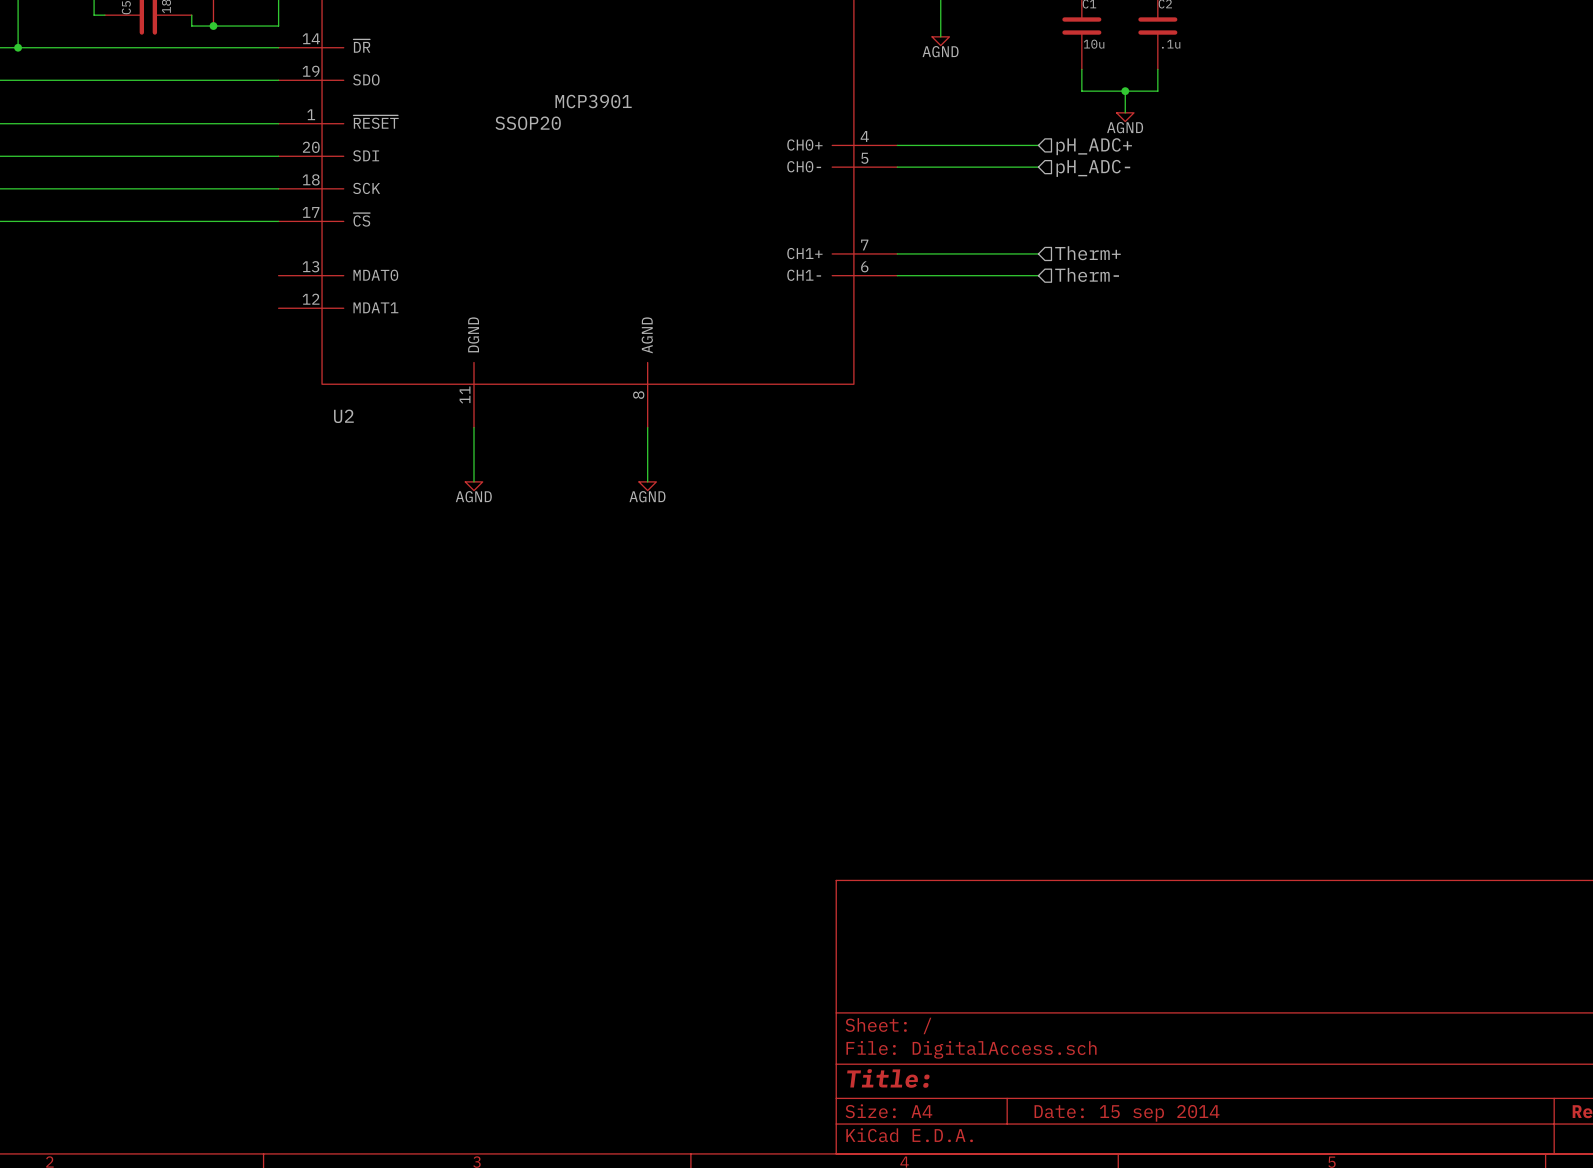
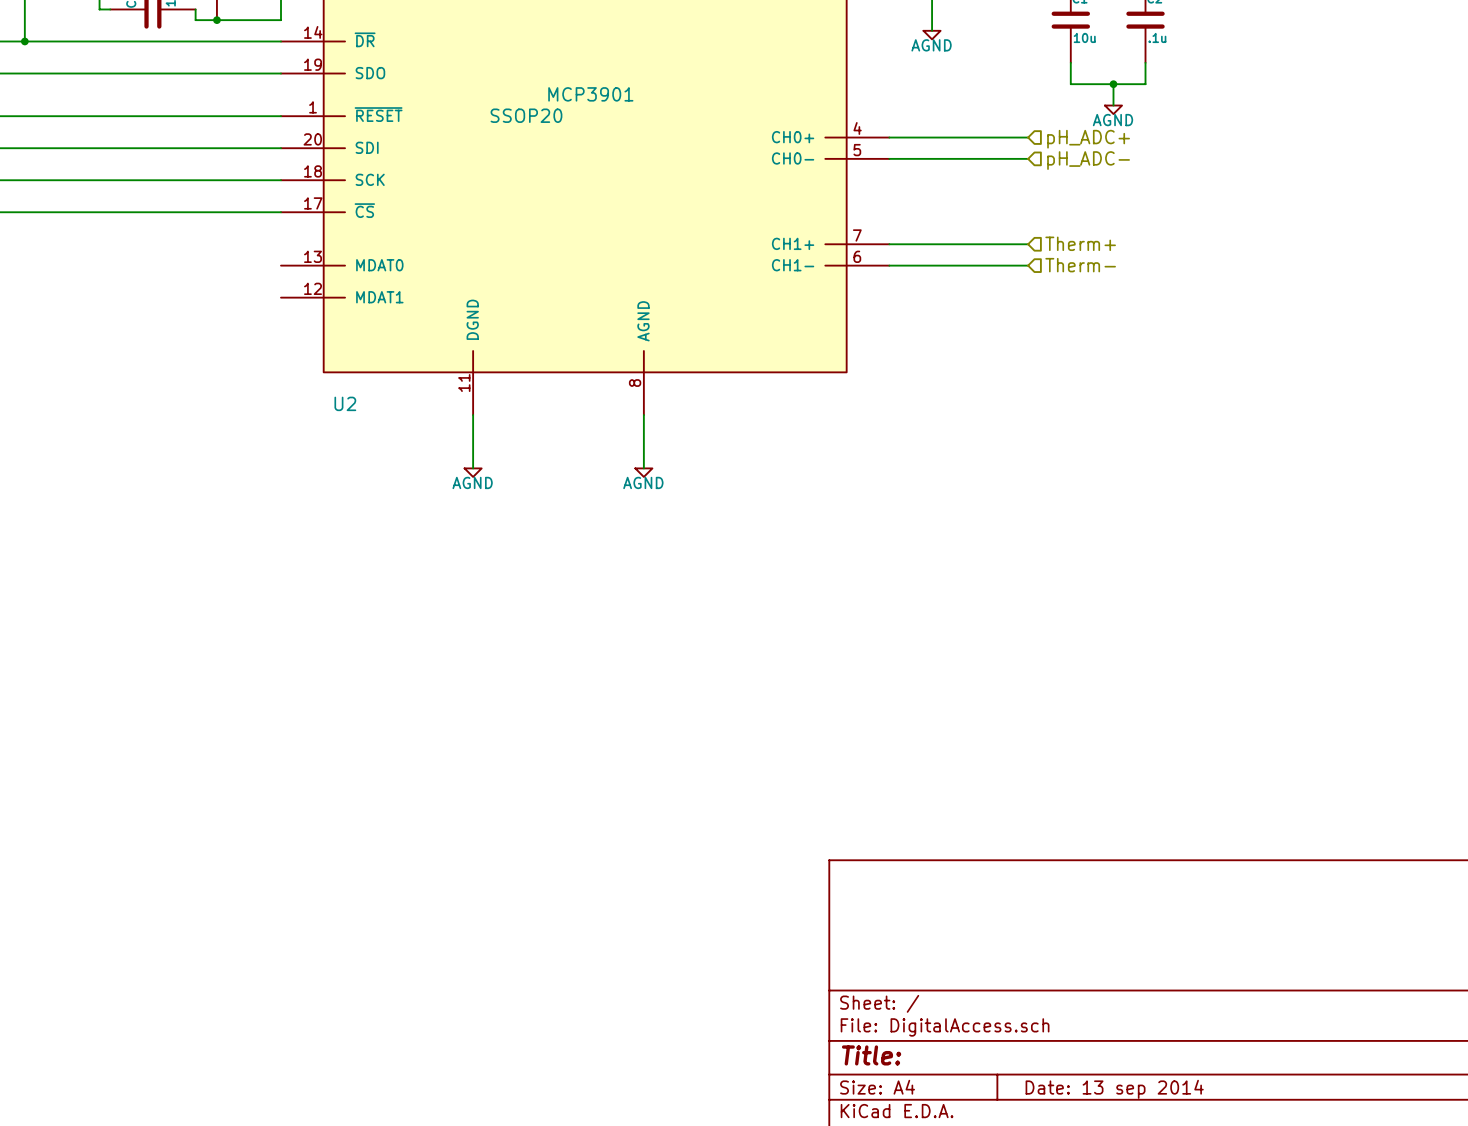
title block: Date: 15 sep 2014 (1127, 1113) -> Date: 13 sep 2014 (1114, 1089)

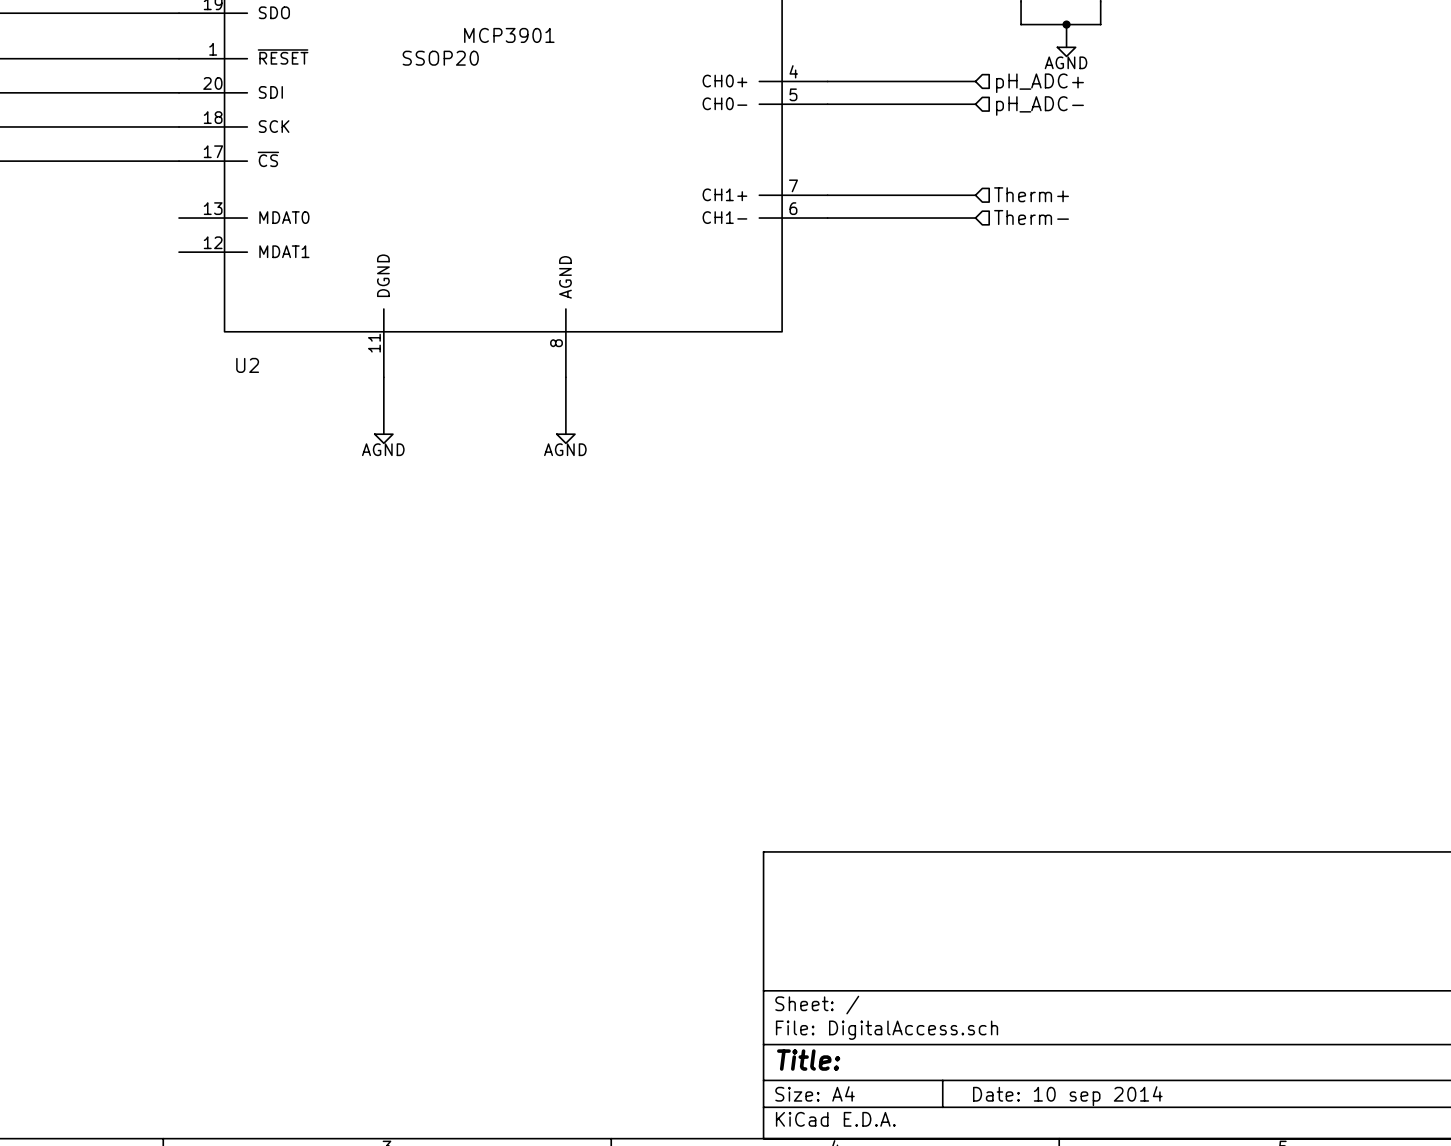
title block: Date: 13 sep 2014 (1114, 1089) -> Date: 10 sep 2014 (1067, 1096)

